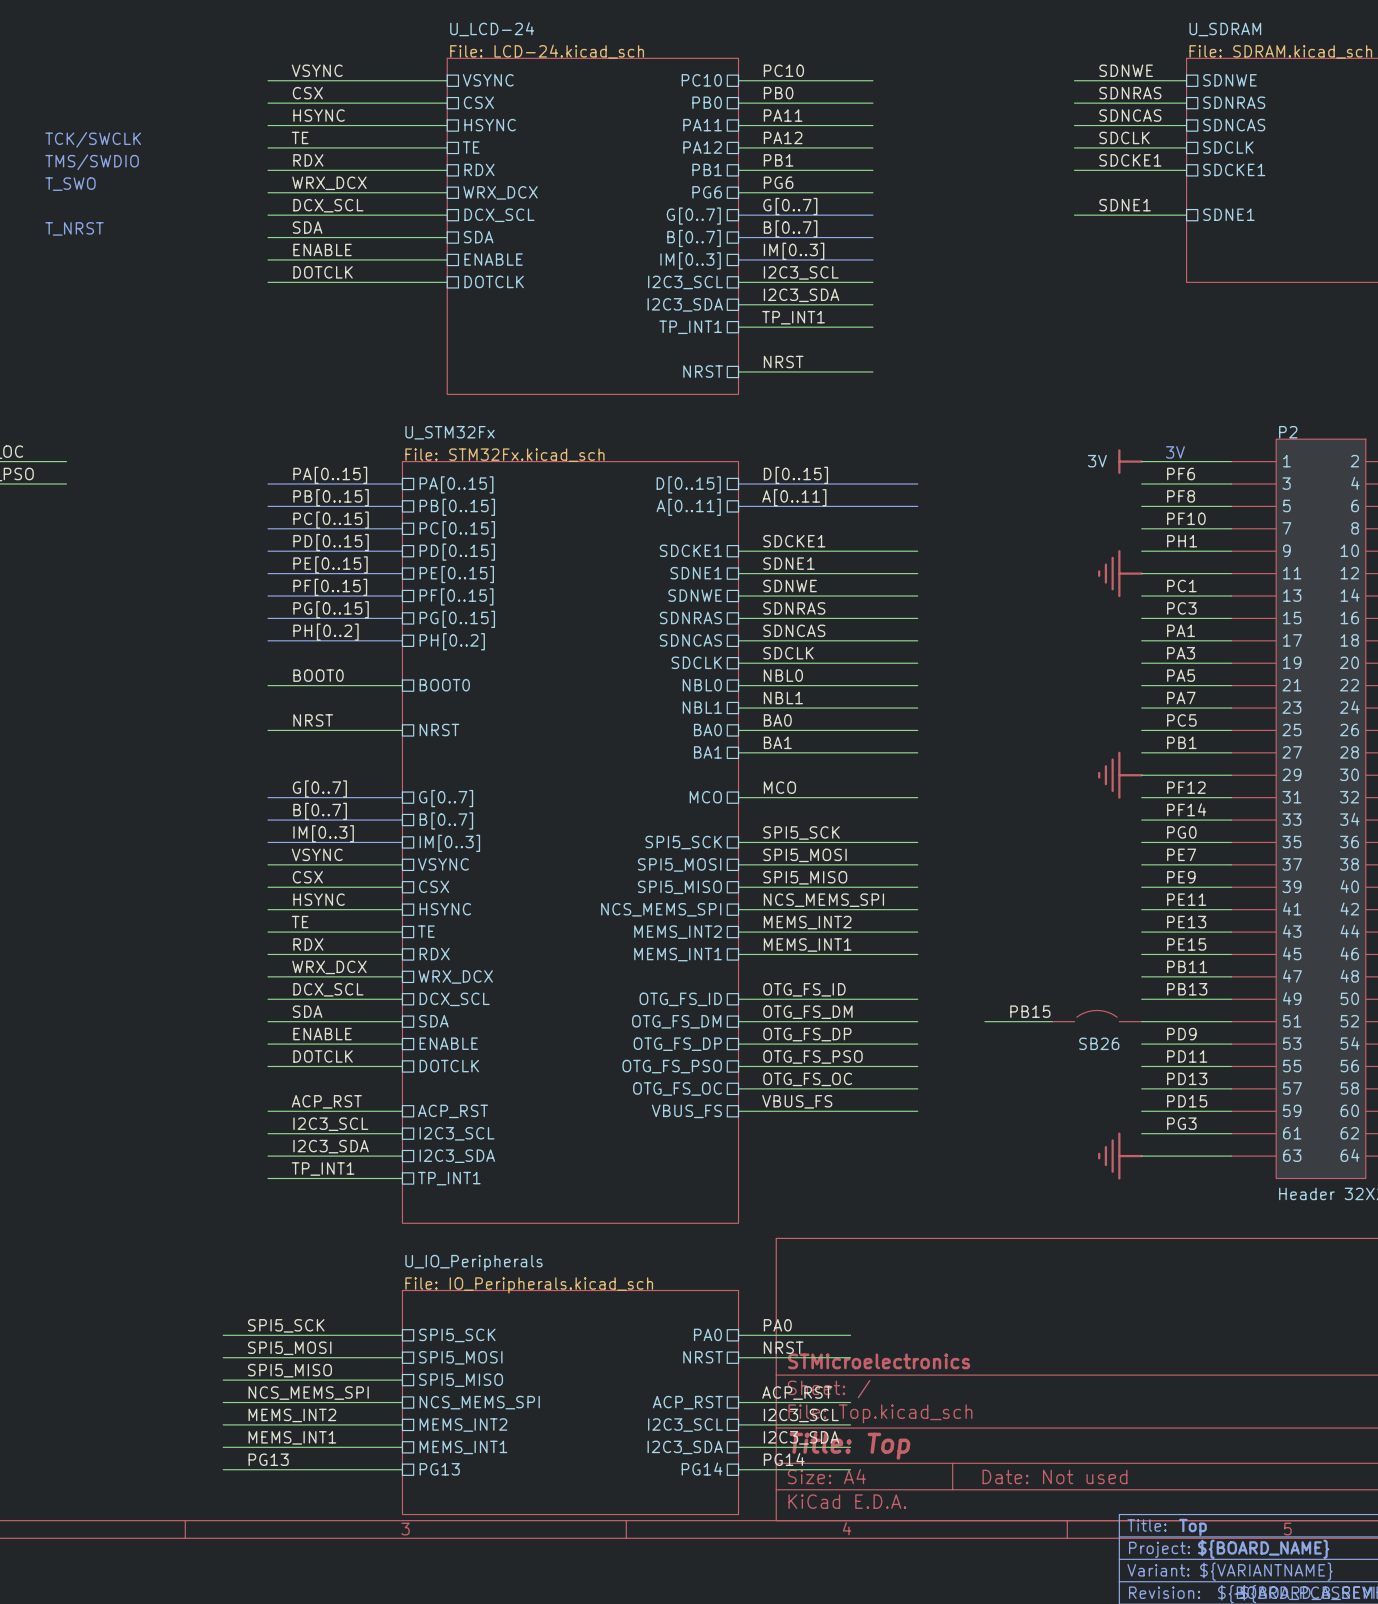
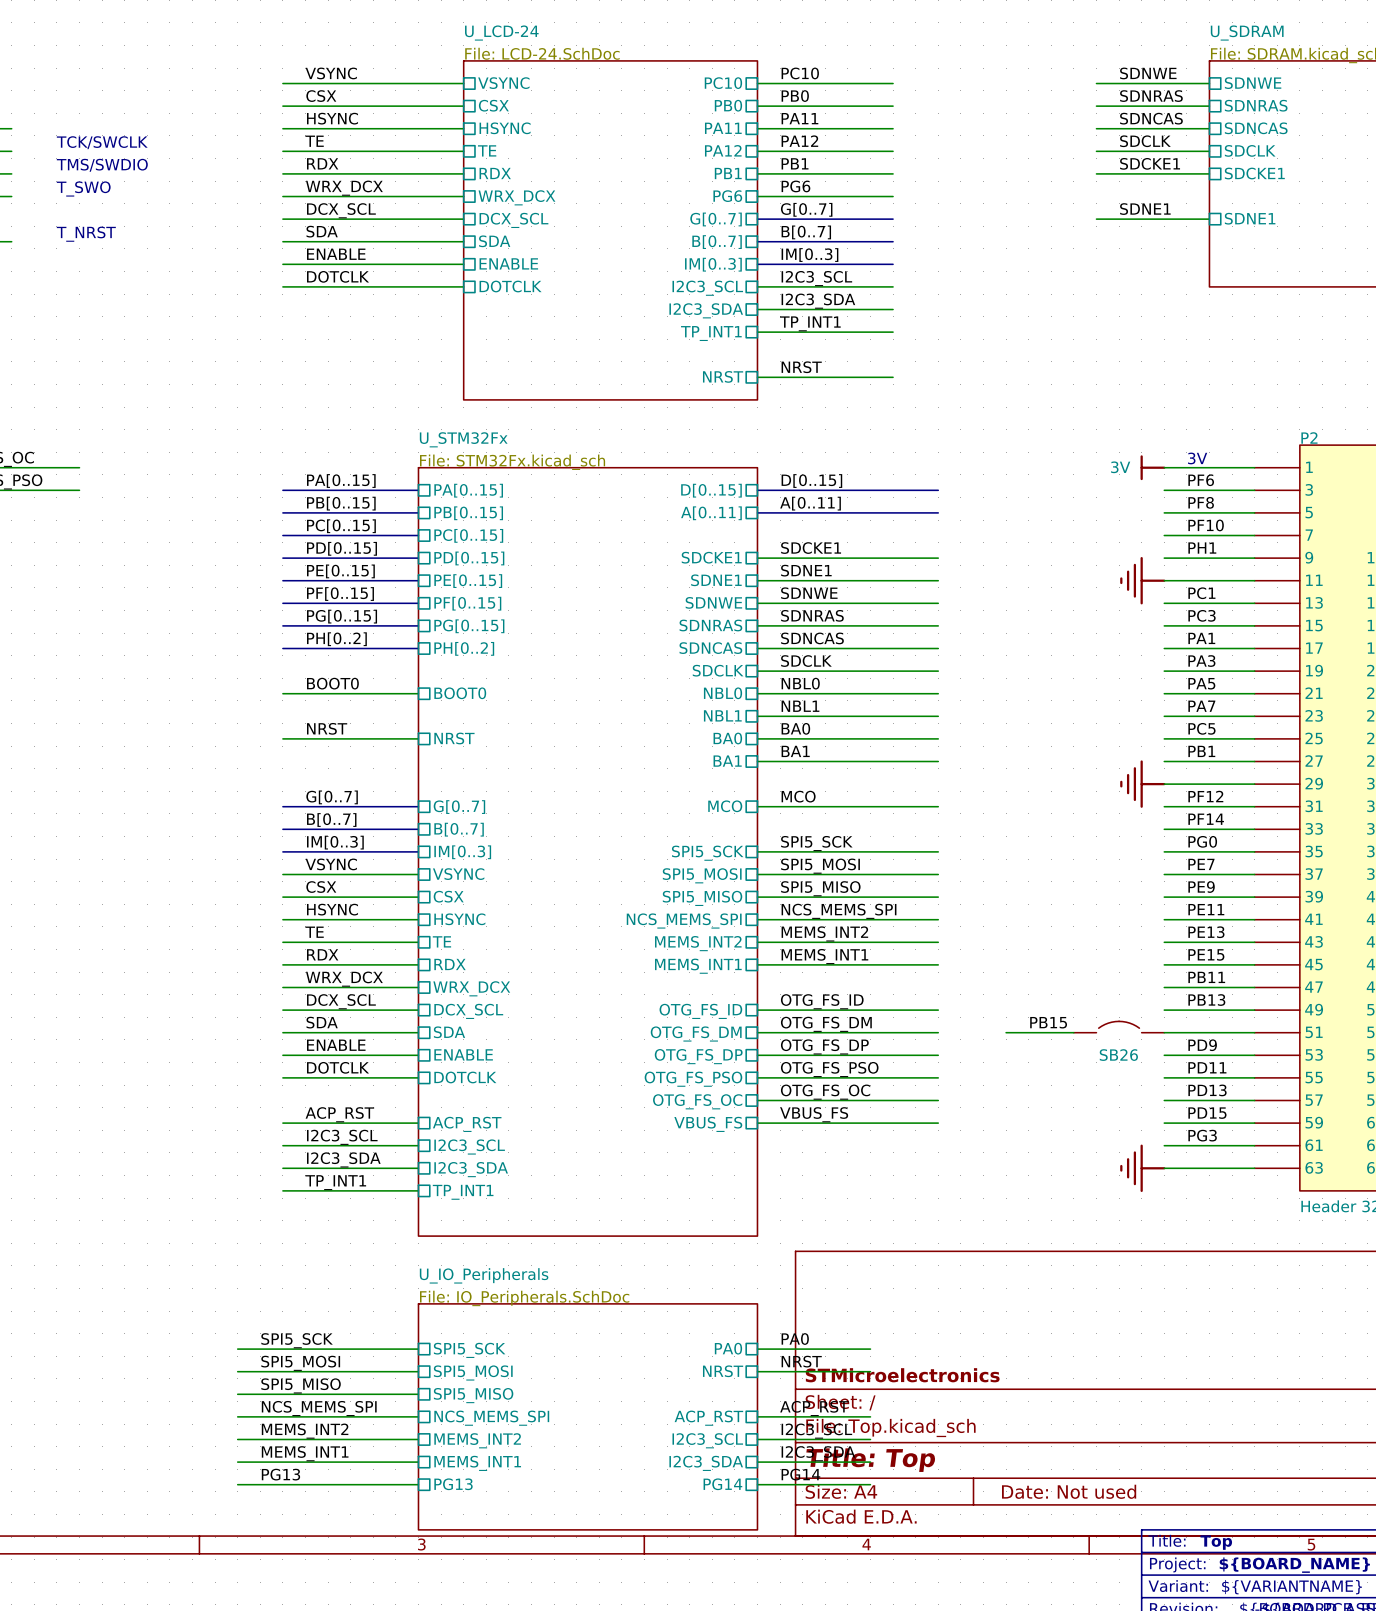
sheet U_LCD-24 value: File: LCD-24.kicad_sch (547, 51) -> File: LCD-24.SchDoc (542, 53)
sheet U_IO_Peripherals value: File: IO_Peripherals.kicad_sch (529, 1285) -> File: IO_Peripherals.SchDoc (524, 1298)

